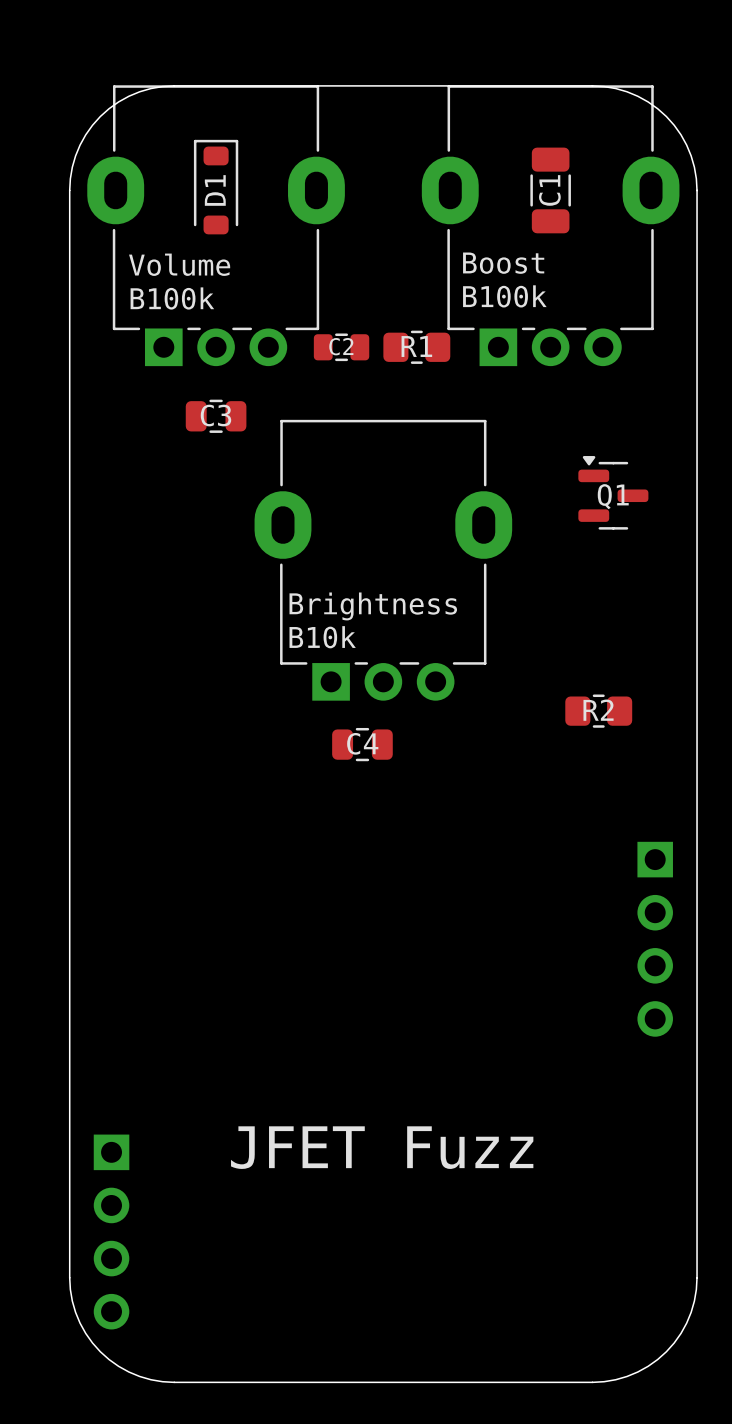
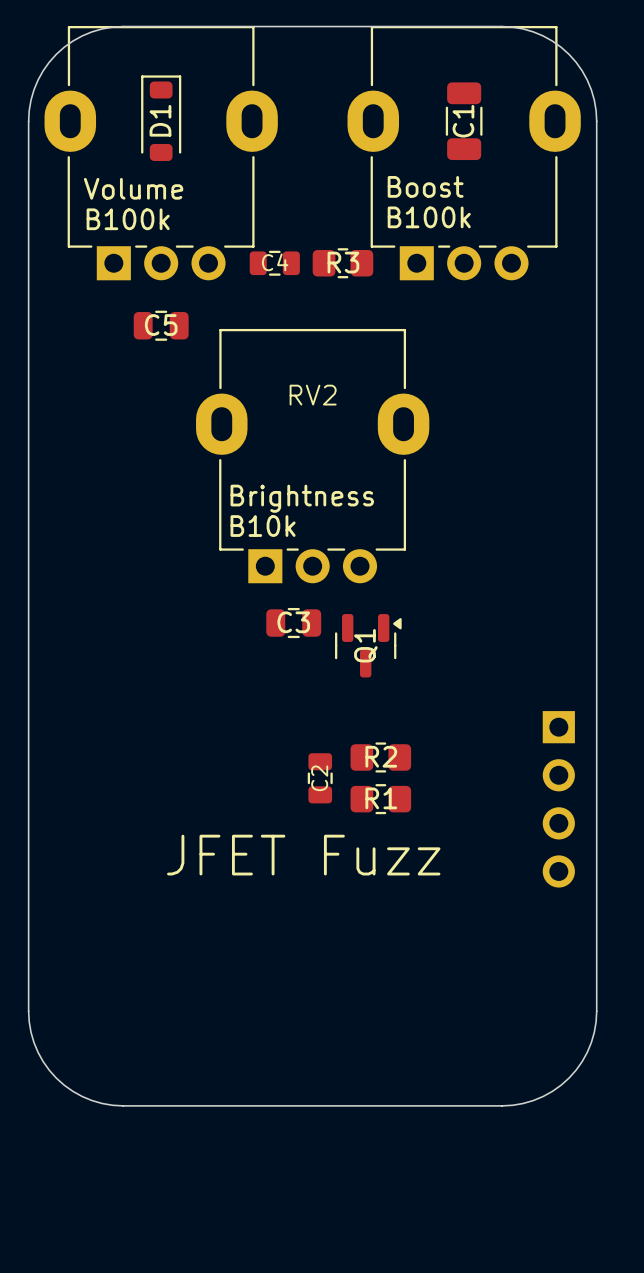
C2 name: C2 (341, 346) -> C4 (275, 262)
R1 name: R1 (416, 346) -> R3 (343, 262)
C3 name: C3 (215, 415) -> C5 (161, 325)
RV2 name: none -> RV2 (313, 395)
Q1 rotation: 0° (613, 492) -> 90° clockwise (368, 645)
Q1 position: (613, 492) -> (368, 645)
R2 position: (598, 711) -> (380, 757)
C4 name: C4 (362, 743) -> C3 (293, 622)
C2: none -> (320, 778)
R1: none -> (380, 799)
text position: JFET Fuzz (382, 1147) -> JFET Fuzz (303, 855)
board edge: (69, 1173) (70, 1289) (80, 1323) (100, 1351) (118, 1366) (150, 1379) (174, 1382) (592, 1382) (627, 1376) (648, 1366) (666, 1351) (681, 1333) (691, 1312) (697, 1277) (697, 1173) -> (28, 1011) (31, 1032) (38, 1052) (56, 1078) (72, 1091) (92, 1100) (123, 1105) (502, 1105) (523, 1103) (552, 1091) (576, 1070) (591, 1042) (596, 1011)
part: (111, 1232) -> none

